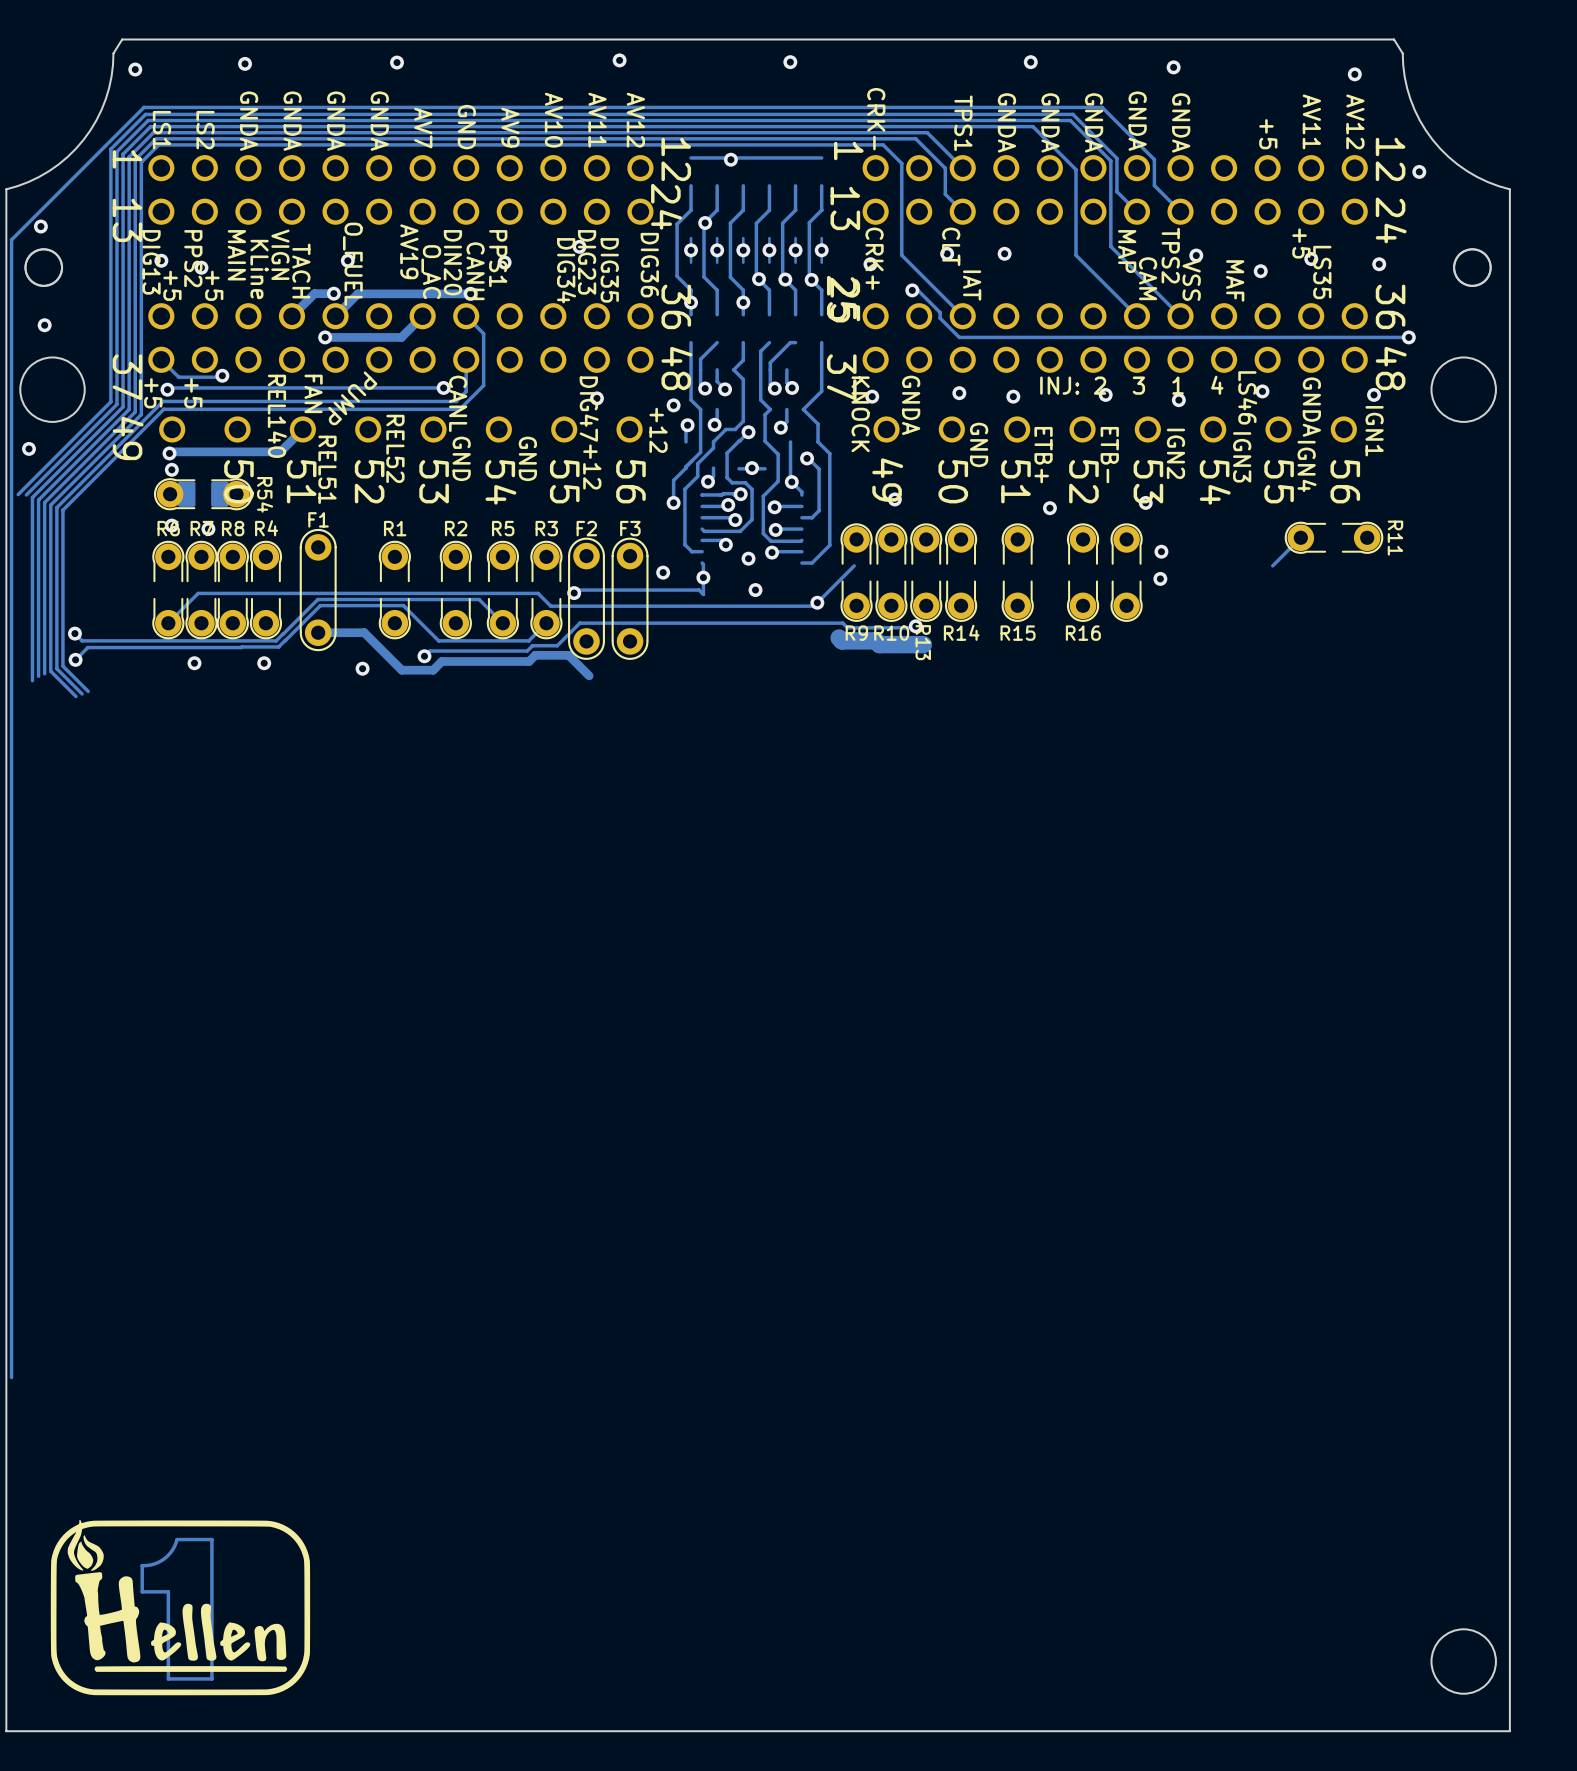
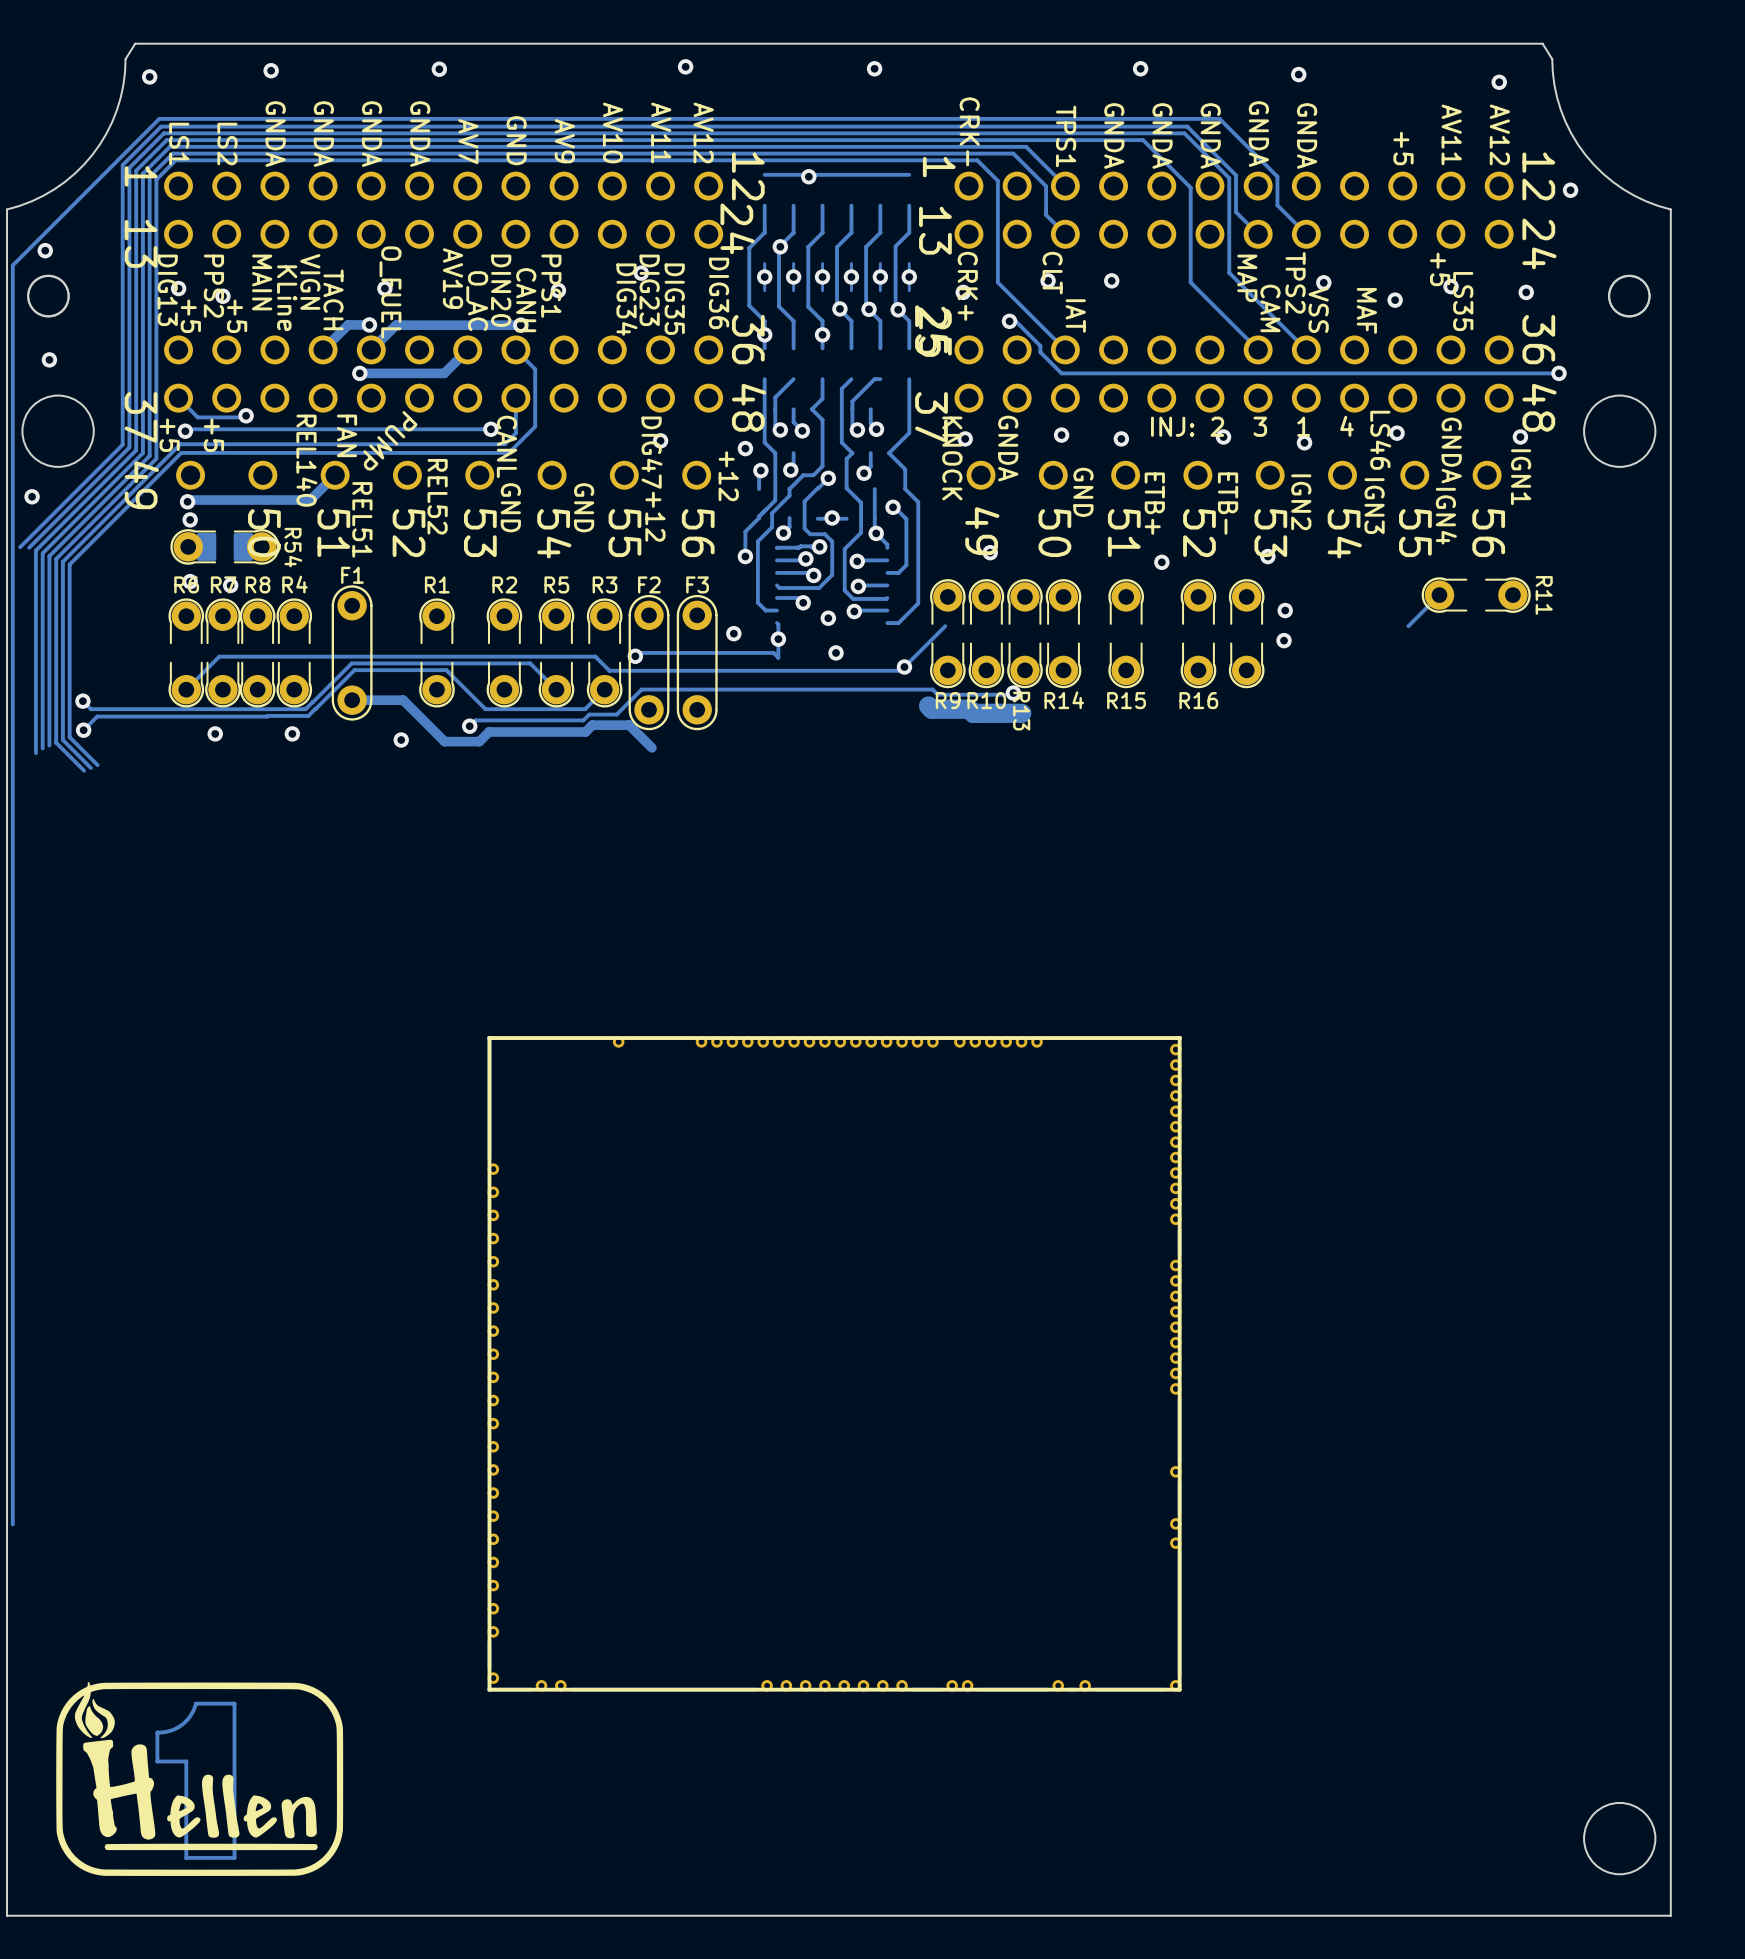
part: none -> (834, 1363)

